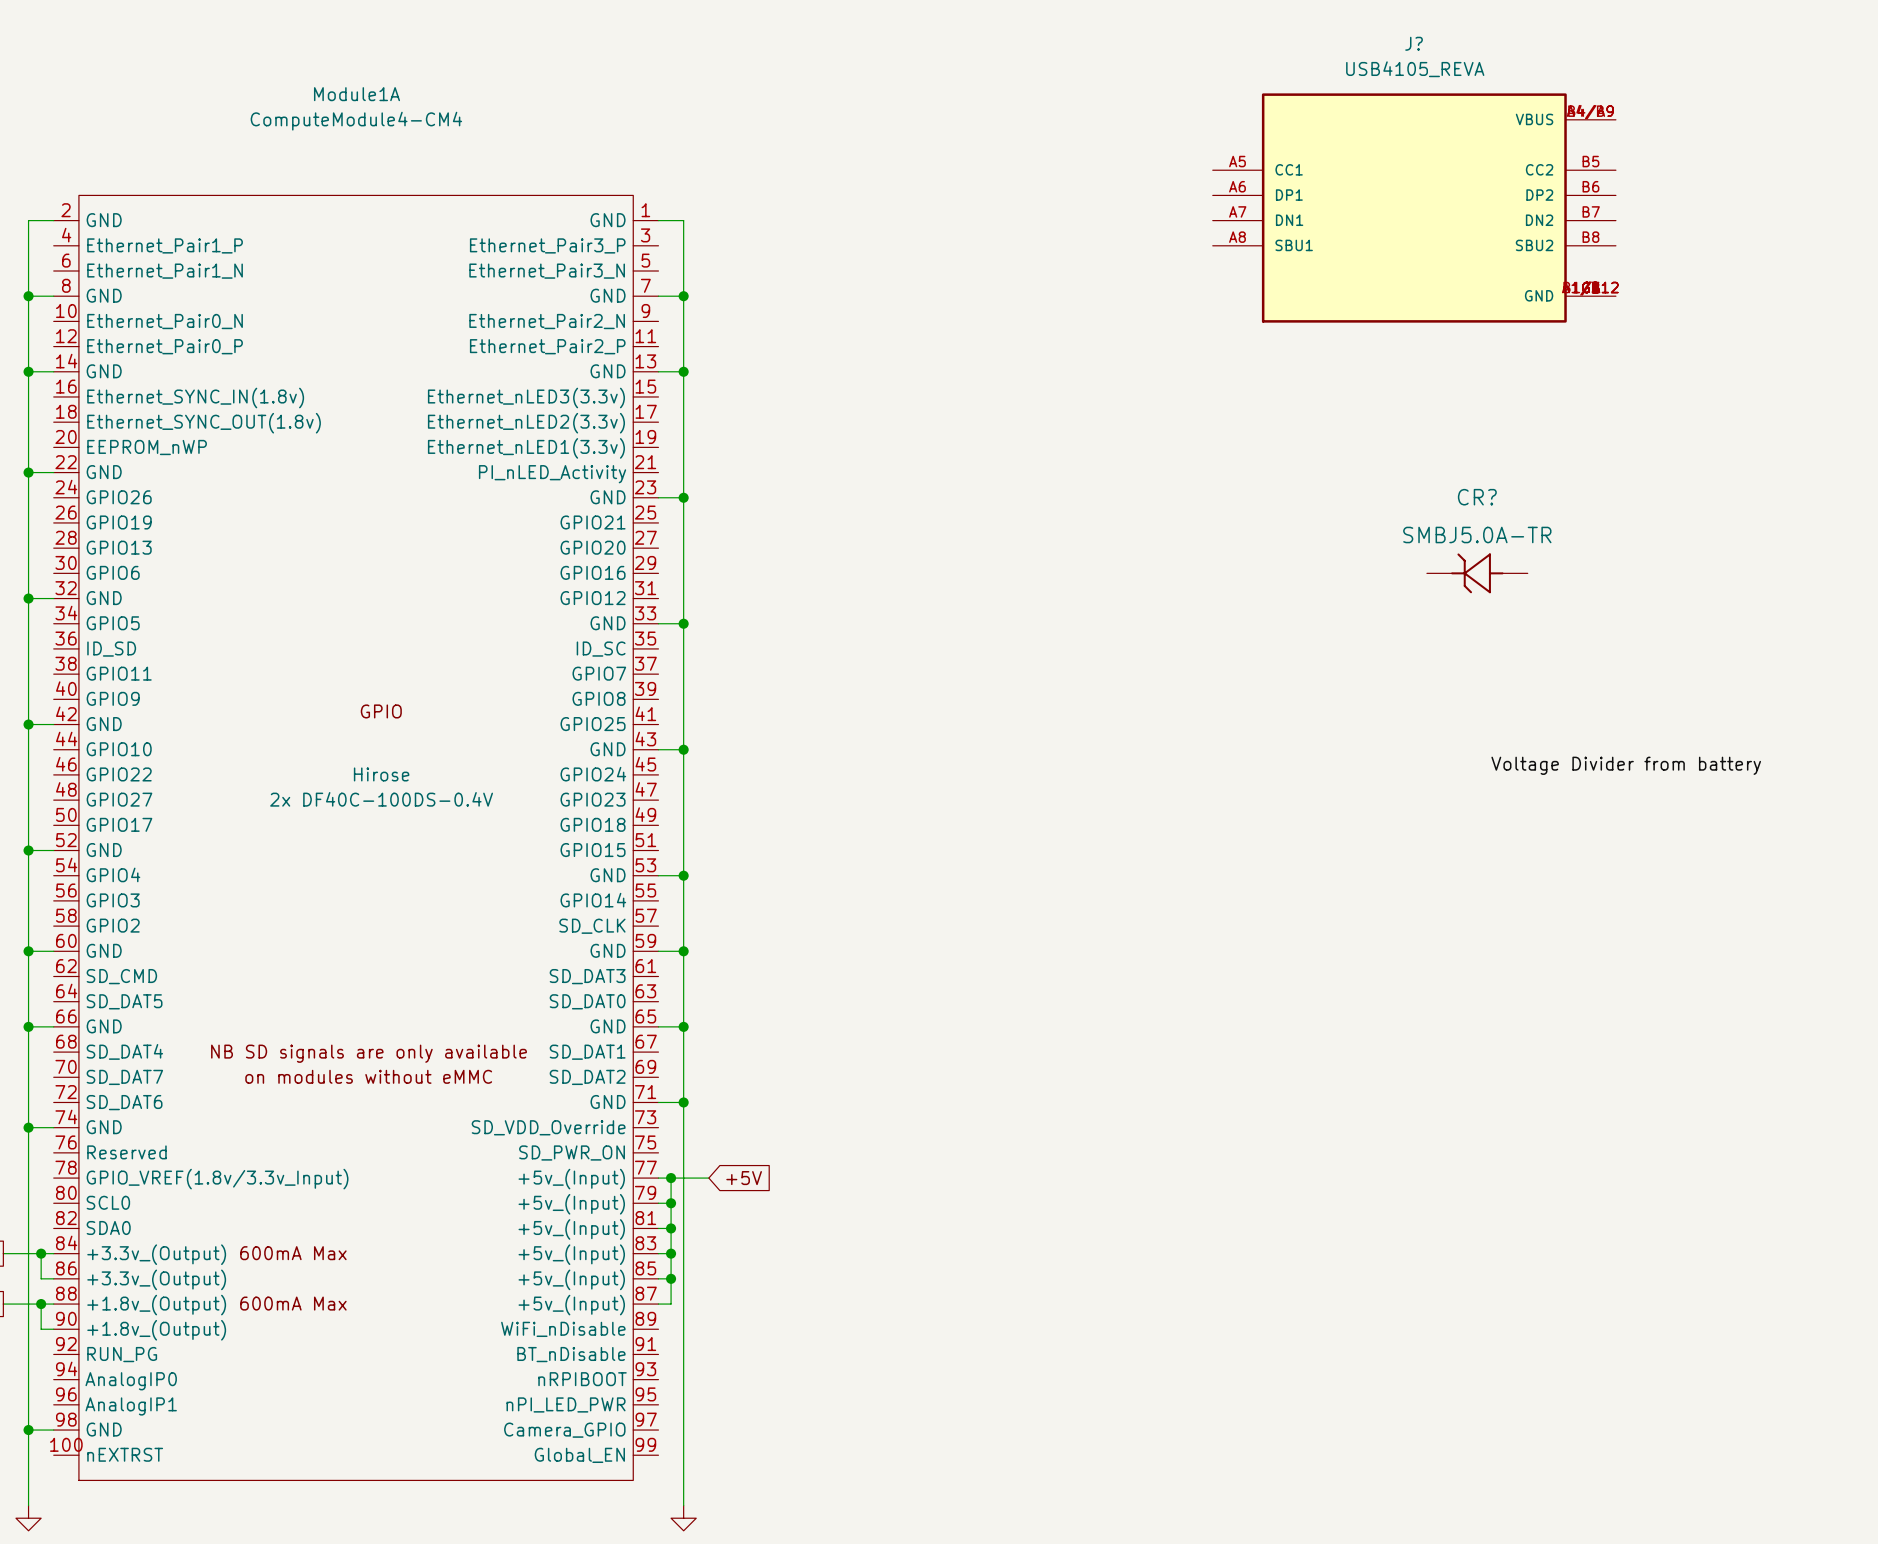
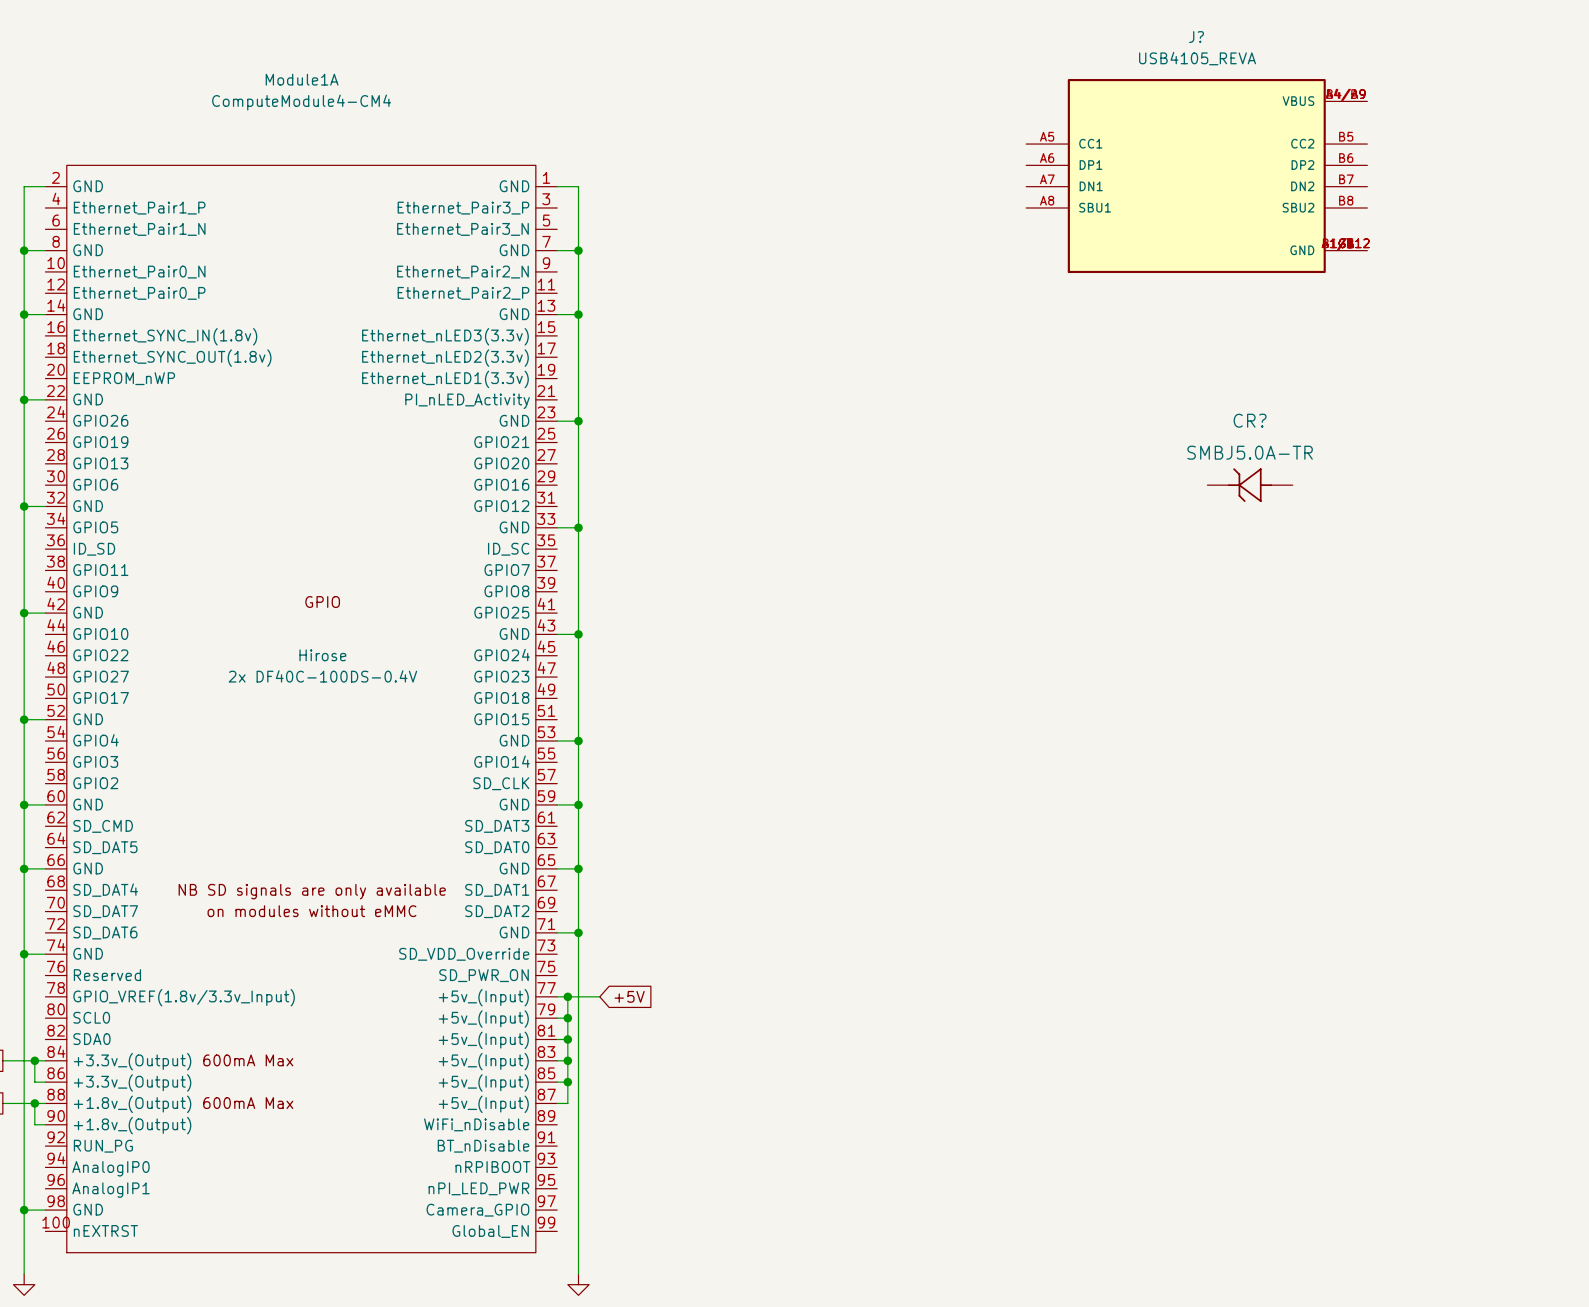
label: Voltage Divider from battery (1626, 765) -> none

